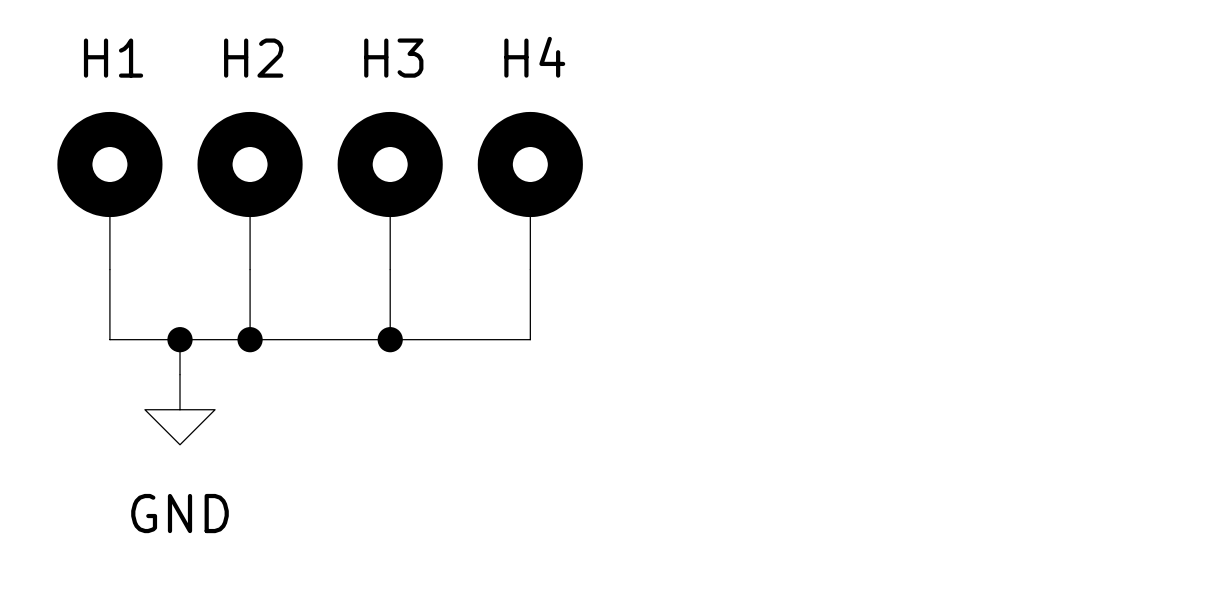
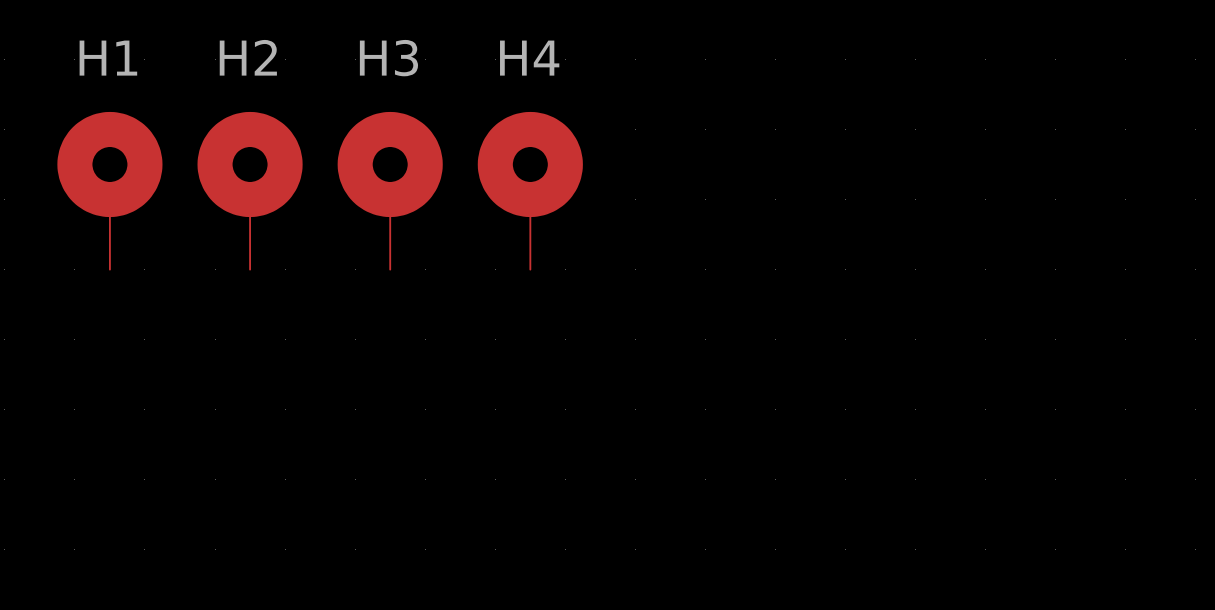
wire: (109, 269) (109, 339) (530, 339) (530, 269) -> none
wire: (250, 269) (250, 339) -> none
wire: (390, 269) (390, 339) -> none
wire: (180, 339) (180, 374) -> none
junction: (180, 339) -> none
junction: (250, 339) -> none
junction: (390, 339) -> none
power symbol: GND (180, 409) -> none

